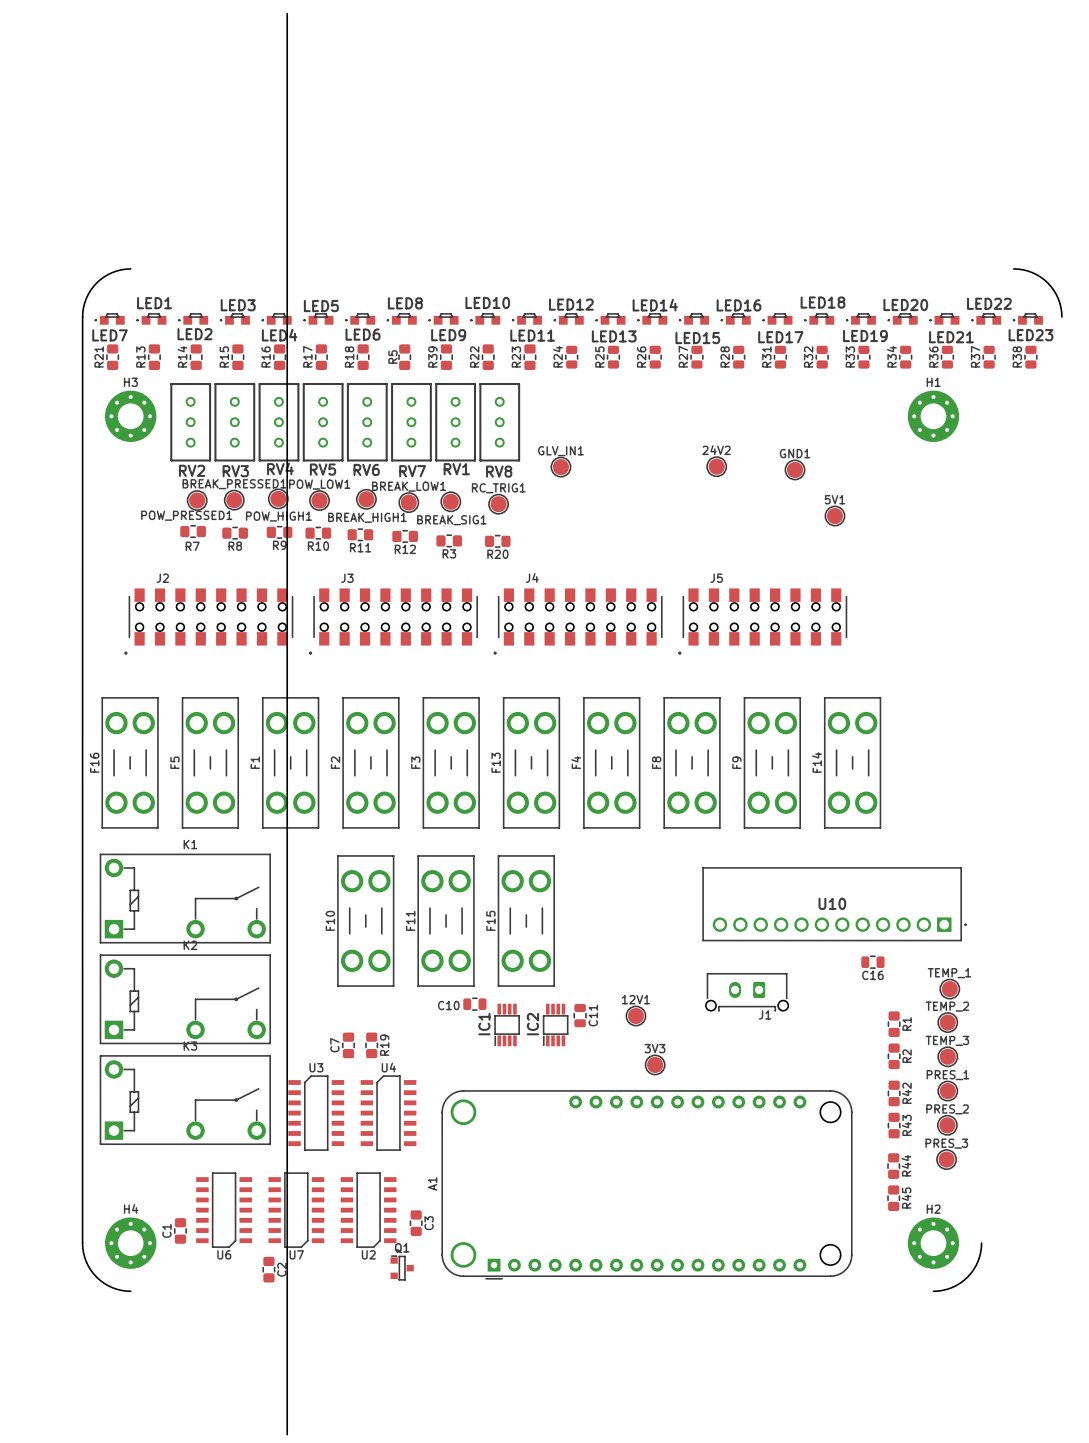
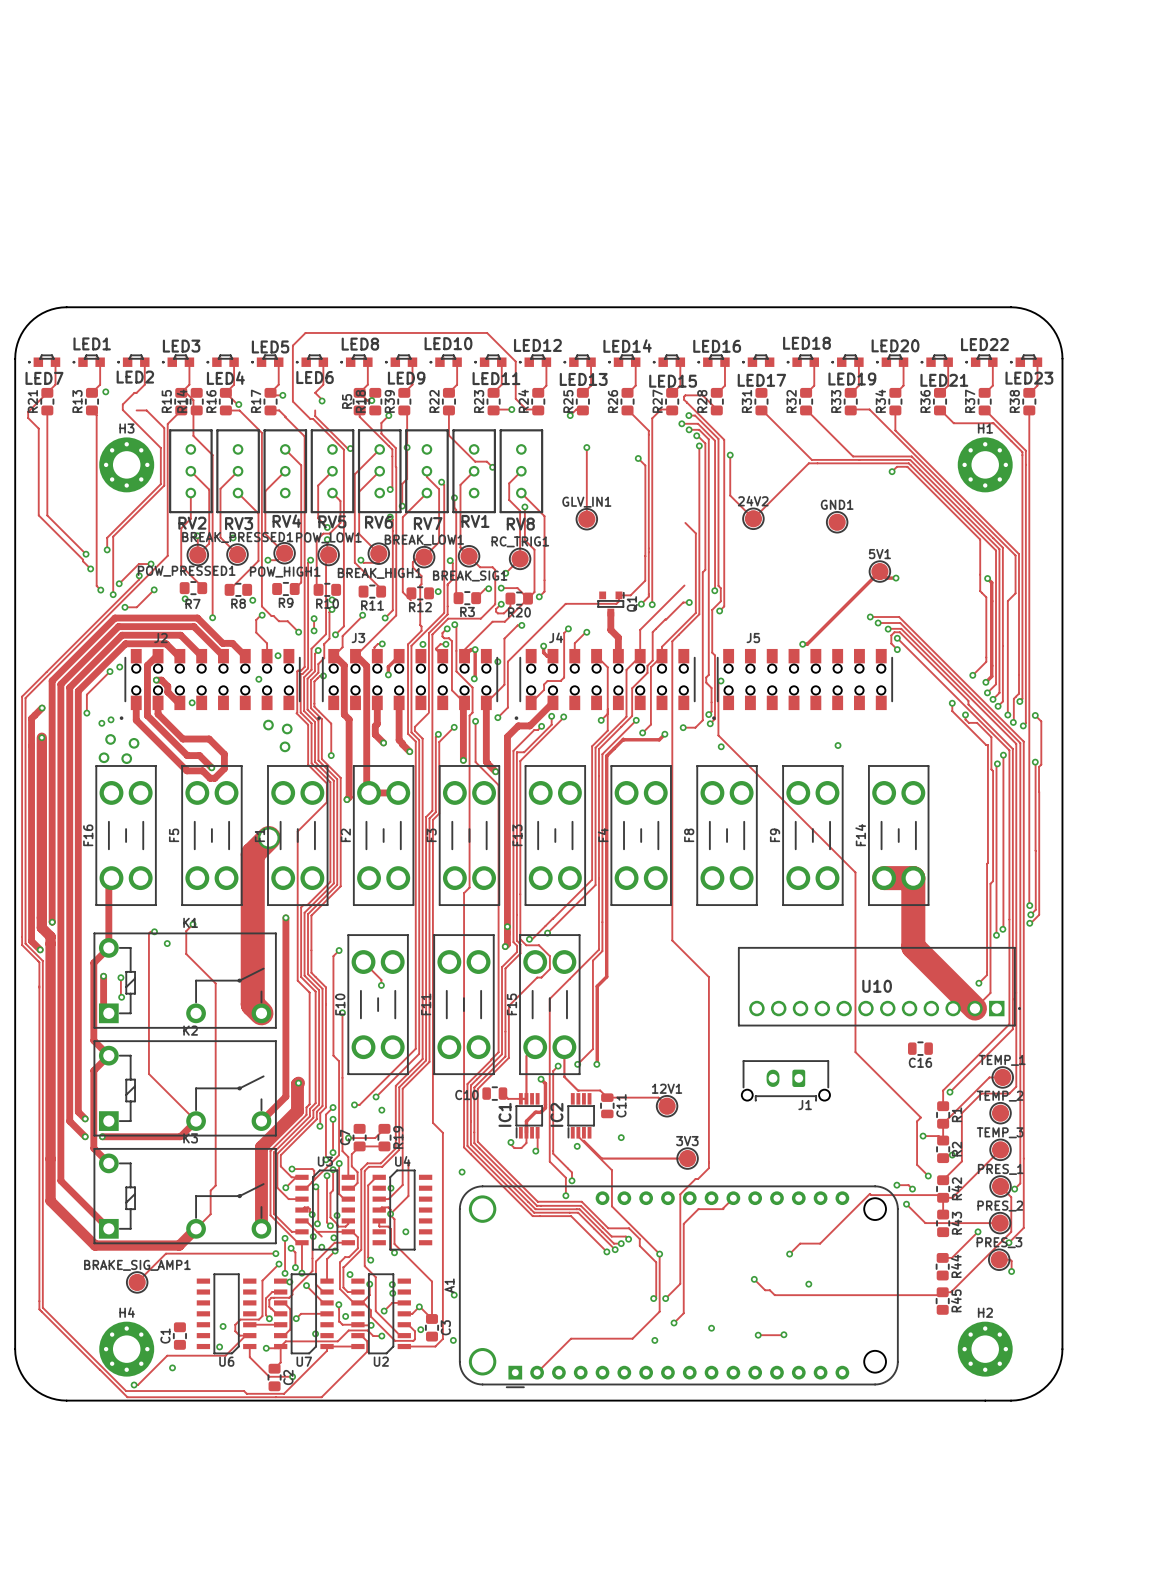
board edge: (287, 13) (287, 1434) -> none
board edge: none -> (66, 307) (1010, 307) (1035, 313) (1050, 326) (1058, 338) (1062, 358) (1062, 1349) (1056, 1373) (1043, 1388) (1025, 1398) (1011, 1400) (66, 1400) (46, 1396) (26, 1381) (19, 1368) (15, 1349) (15, 358) (19, 339) (30, 322) (46, 311) (66, 307)
board edge: (130, 268) (116, 270) (100, 279) (88, 294) (82, 312) (82, 1243) (86, 1261) (96, 1277) (112, 1287) (130, 1291) -> none
board edge: (1013, 268) (1032, 272) (1047, 282) (1058, 298) (1061, 316) -> none
LED7 position: (109, 319) -> (44, 360)
LED1 position: (151, 319) -> (88, 360)
LED2 position: (193, 319) -> (133, 360)
LED3 position: (235, 319) -> (178, 360)
LED4 position: (276, 319) -> (222, 360)
LED5 position: (318, 319) -> (267, 360)
LED6 position: (360, 319) -> (312, 360)
LED8 position: (401, 319) -> (356, 360)
LED9 position: (443, 319) -> (401, 360)
LED10 position: (485, 319) -> (445, 360)
LED11 position: (527, 319) -> (490, 360)
LED12 position: (568, 319) -> (535, 360)
LED13 position: (610, 319) -> (579, 360)
LED14 position: (652, 319) -> (624, 360)
LED15 position: (694, 319) -> (669, 360)
LED16 position: (735, 319) -> (713, 360)
LED17 position: (777, 319) -> (758, 360)
LED18 position: (819, 319) -> (803, 360)
LED19 position: (861, 319) -> (847, 360)
LED20 position: (902, 319) -> (892, 360)
LED21 position: (944, 319) -> (937, 360)
LED22 position: (986, 319) -> (981, 360)
LED23 position: (1028, 319) -> (1026, 360)
track: none -> (55, 362) (55, 384) (28, 412) (28, 418) (38, 428) (38, 515) (90, 568)
track: none -> (100, 362) (100, 384) (91, 392)
track: none -> (144, 362) (144, 384) (122, 404) (122, 409) (160, 448) (160, 484) (107, 537) (107, 549)
track: none -> (189, 362) (189, 384) (181, 392) (186, 392) (193, 400) (193, 435) (212, 455) (212, 617)
track: none -> (234, 362) (234, 384) (225, 392) (238, 404)
track: none -> (278, 362) (278, 384) (270, 392) (273, 395) (282, 395)
track: none -> (323, 362) (323, 384) (315, 392) (322, 401)
track: none -> (367, 362) (367, 384) (359, 392) (367, 400) (371, 400)
track: none -> (412, 362) (412, 384) (404, 392)
track: none -> (457, 362) (457, 384) (448, 392)
track: none -> (501, 362) (501, 384) (493, 392)
track: none -> (546, 362) (546, 385) (538, 393)
track: none -> (591, 362) (591, 385) (582, 393)
track: none -> (635, 362) (635, 385) (627, 393)
track: none -> (680, 362) (680, 385) (672, 393)
track: none -> (724, 362) (724, 385) (716, 393)
track: none -> (814, 362) (814, 385) (806, 393)
track: none -> (858, 362) (858, 385) (850, 393)
track: none -> (903, 362) (903, 385) (895, 393)
track: none -> (948, 362) (948, 385) (940, 393)
track: none -> (992, 362) (992, 385) (984, 393)
track: none -> (1037, 362) (1037, 385) (1029, 393)
R24 footprint: [565, 345, 579, 369] -> [531, 387, 545, 416]
R25 footprint: [607, 345, 620, 369] -> [576, 387, 590, 416]
R26 footprint: [648, 345, 662, 369] -> [620, 387, 635, 416]
R27 footprint: [690, 345, 704, 369] -> [665, 387, 679, 416]
R28 footprint: [732, 345, 746, 369] -> [710, 387, 724, 416]
R31 footprint: [774, 345, 787, 369] -> [754, 387, 769, 416]
R32 footprint: [815, 345, 829, 369] -> [799, 387, 813, 416]
R33 footprint: [857, 345, 871, 369] -> [844, 387, 858, 416]
R34 footprint: [899, 345, 913, 369] -> [888, 387, 902, 416]
R36 footprint: [941, 345, 954, 369] -> [933, 387, 947, 416]
R37 footprint: [982, 345, 996, 369] -> [978, 387, 992, 416]
R38 footprint: [1024, 345, 1038, 369] -> [1022, 387, 1036, 416]
via: none -> (105, 391)
via: none -> (282, 395)
via: none -> (322, 401)
via: none -> (371, 400)
R21 position: (112, 357) -> (47, 401)
R13 position: (154, 357) -> (91, 401)
R15 position: (237, 357) -> (181, 401)
R16 position: (279, 357) -> (225, 401)
R17 position: (321, 357) -> (270, 401)
R5 position: (404, 357) -> (359, 401)
R39 position: (446, 357) -> (404, 401)
R22 position: (488, 357) -> (448, 401)
R23 position: (529, 357) -> (493, 401)
track: none -> (686, 402) (684, 399) (685, 395) (702, 395) (716, 409)
track: none -> (686, 402) (724, 439) (724, 606) (719, 611)
via: none -> (238, 404)
track: none -> (511, 409) (493, 410)
via: none -> (511, 409)
track: none -> (538, 409) (526, 409) (515, 398) (515, 361) (487, 332) (305, 332) (292, 345) (292, 401) (343, 449) (343, 626) (335, 634)
track: none -> (582, 409) (576, 409) (570, 415)
track: none -> (627, 409) (648, 430) (648, 596) (641, 604)
track: none -> (672, 409) (661, 409) (652, 418) (652, 604)
track: none -> (761, 409) (811, 459) (910, 459) (999, 549) (999, 692) (993, 699)
track: none -> (806, 409) (853, 456) (911, 456) (1002, 547) (1002, 701) (998, 706)
track: none -> (850, 409) (869, 409) (1015, 555) (1015, 593) (1007, 601) (1007, 715)
track: none -> (895, 409) (895, 430) (1018, 554) (1018, 693) (1013, 698) (1013, 722)
track: none -> (940, 409) (953, 423) (993, 423) (1022, 452) (1022, 698) (1019, 701)
track: none -> (984, 409) (1025, 450) (1025, 723) (1023, 725)
track: none -> (1029, 409) (1029, 905)
track: none -> (47, 410) (47, 515) (86, 554)
track: none -> (91, 410) (96, 415) (96, 585) (100, 590)
track: none -> (136, 410) (146, 410) (164, 428) (164, 485) (113, 536) (113, 594)
track: none -> (181, 410) (167, 423) (167, 555) (25, 698) (25, 943) (42, 960) (42, 1307) (126, 1391) (244, 1391) (246, 1393) (284, 1393) (327, 1350) (327, 1346) (357, 1346)
track: none -> (225, 410) (239, 410) (261, 432) (261, 606) (278, 621) (287, 621) (298, 632)
track: none -> (270, 410) (279, 410) (304, 436) (304, 667) (297, 671) (296, 713) (308, 724) (308, 764) (326, 783) (326, 802) (297, 831) (297, 980) (309, 992) (309, 1104) (306, 1107) (306, 1114) (270, 1150) (270, 1215) (297, 1242) (301, 1242) (301, 1273)
track: none -> (315, 410) (315, 416) (347, 448) (350, 448)
track: none -> (359, 410) (359, 416) (392, 449) (392, 487) (390, 489)
track: none -> (404, 410) (407, 413) (407, 479) (402, 483) (402, 506)
track: none -> (448, 410) (448, 435) (475, 461) (486, 461) (492, 467)
track: none -> (388, 415) (381, 422) (381, 433) (395, 448) (396, 615) (355, 656) (366, 666) (366, 790) (369, 792) (398, 792)
via: none -> (388, 415)
via: none -> (570, 415)
track: none -> (688, 415) (695, 415) (718, 438) (718, 585) (720, 588) (720, 601) (712, 609) (712, 652) (714, 655) (714, 719) (710, 723)
via: none -> (688, 415)
track: none -> (681, 423) (698, 423) (715, 440) (714, 590)
via: none -> (681, 423)
track: none -> (689, 429) (699, 429) (708, 439) (708, 674) (706, 677) (706, 682) (711, 687) (711, 711) (708, 714)
via: none -> (689, 429)
track: none -> (696, 435) (705, 443) (702, 720) (695, 727) (683, 727)
via: none -> (696, 435)
track: none -> (699, 445) (699, 614) (672, 641) (672, 940) (708, 977) (708, 1168) (680, 1194) (680, 1283) (665, 1298)
via: none -> (699, 445)
via: none -> (407, 447)
track: none -> (586, 447) (586, 519)
via: none -> (586, 447)
track: none -> (285, 449) (301, 465) (301, 582) (294, 588)
via: none -> (350, 448)
track: none -> (379, 449) (354, 474) (354, 562) (381, 588) (381, 591)
track: none -> (730, 455) (730, 495) (753, 518) (808, 463) (908, 463) (996, 550) (996, 684) (987, 692)
via: none -> (730, 455)
track: none -> (638, 458) (645, 465) (645, 556)
via: none -> (638, 458)
via: none -> (492, 467)
track: none -> (190, 471) (209, 489) (209, 543) (197, 554) (197, 535)
track: none -> (238, 471) (220, 488) (220, 537) (237, 554)
track: none -> (285, 471) (265, 491) (265, 533) (284, 553) (277, 560) (267, 560)
track: none -> (332, 471) (318, 485) (318, 518) (327, 527)
track: none -> (379, 471) (359, 491) (359, 534) (378, 553) (378, 561) (363, 562) (360, 560)
track: none -> (426, 471) (426, 477) (439, 489) (439, 542) (424, 557) (418, 557) (412, 562) (412, 567) (421, 575) (421, 630) (408, 644) (408, 733) (415, 741) (415, 1048) (359, 1104) (354, 1104)
track: none -> (474, 471) (460, 484) (460, 547) (480, 567) (492, 567) (495, 569) (495, 604) (480, 618) (448, 618) (432, 634) (432, 810) (426, 817) (426, 1060) (399, 1087) (399, 1149) (382, 1166) (368, 1166) (364, 1170) (364, 1266) (375, 1277) (375, 1311) (400, 1335) (404, 1335)
track: none -> (521, 471) (509, 483) (509, 500) (520, 510) (520, 558) (505, 573)
track: none -> (892, 471) (897, 466) (907, 466) (980, 539) (980, 591) (986, 597) (986, 661) (972, 675)
via: none -> (892, 471)
track: none -> (441, 482) (444, 484) (444, 613) (411, 645) (411, 732) (419, 740) (419, 1053) (376, 1096)
via: none -> (441, 482)
via: none -> (390, 489)
track: none -> (190, 493) (190, 518) (181, 528) (181, 565) (202, 588)
track: none -> (238, 493) (258, 513) (258, 560) (229, 589)
track: none -> (332, 493) (340, 501) (340, 522) (329, 533) (323, 533) (316, 540) (316, 588) (318, 589)
track: none -> (426, 493) (402, 517) (402, 592) (410, 600)
track: none -> (521, 493) (544, 516) (544, 591) (539, 596)
track: none -> (454, 497) (456, 509) (456, 595) (458, 598)
via: none -> (454, 497)
via: none -> (402, 506)
track: none -> (524, 507) (524, 540) (534, 549) (534, 592) (504, 621) (492, 621) (464, 649)
via: none -> (524, 507)
track: none -> (390, 517) (392, 519) (392, 610) (385, 618)
via: none -> (390, 517)
track: none -> (685, 522) (695, 533) (695, 612) (661, 646) (661, 656) (650, 667) (650, 724) (642, 732)
via: none -> (327, 527)
via: none -> (197, 535)
via: none -> (233, 537)
track: none -> (327, 539) (328, 554) (326, 557) (326, 634) (311, 648) (311, 669) (304, 677) (304, 711) (315, 721) (315, 761) (333, 780) (333, 883) (304, 912) (304, 975) (319, 990) (319, 1104) (313, 1110) (313, 1117) (277, 1153) (277, 1187) (288, 1199) (301, 1199)
via: none -> (327, 539)
via: none -> (107, 549)
via: none -> (86, 554)
track: none -> (645, 556) (645, 580) (630, 595) (618, 595) (618, 601) (616, 603) (565, 603) (507, 661) (507, 707) (497, 717)
via: none -> (267, 560)
track: none -> (310, 560) (308, 562) (308, 668) (300, 674) (300, 712) (311, 723) (311, 763) (330, 782) (330, 882) (307, 905) (301, 907) (301, 977) (315, 991) (315, 1103) (309, 1108) (309, 1116) (273, 1152) (273, 1213) (291, 1231) (301, 1231)
via: none -> (310, 560)
via: none -> (360, 560)
track: none -> (450, 560) (452, 563) (452, 579) (447, 584) (447, 614) (428, 633) (428, 712)
via: none -> (450, 560)
track: none -> (151, 564) (138, 564) (119, 583)
via: none -> (151, 564)
via: none -> (90, 568)
via: none -> (505, 573)
track: none -> (139, 575) (139, 579) (22, 696) (22, 945) (39, 962) (39, 1309) (127, 1397) (321, 1397) (367, 1351) (367, 1341) (361, 1335) (357, 1335)
via: none -> (139, 575)
track: none -> (896, 578) (886, 578) (879, 571) (807, 644) (802, 644)
via: none -> (896, 578)
track: none -> (987, 578) (991, 582) (991, 676) (985, 682)
via: none -> (987, 578)
via: none -> (119, 583)
track: none -> (684, 585) (640, 629) (640, 656) (626, 669) (626, 716) (595, 747) (595, 885) (547, 933)
track: none -> (501, 588) (517, 588) (528, 598)
via: none -> (501, 588)
track: none -> (488, 588) (485, 588) (476, 598)
via: none -> (488, 588)
via: none -> (100, 590)
track: none -> (154, 589) (136, 607) (124, 607)
via: none -> (154, 589)
via: none -> (714, 590)
via: none -> (438, 591)
via: none -> (113, 594)
via: none -> (539, 596)
via: none -> (185, 598)
track: none -> (510, 598) (510, 606) (503, 613) (497, 613) (496, 609) (501, 604)
via: none -> (252, 600)
via: none -> (332, 599)
track: none -> (689, 602) (683, 602) (652, 632) (652, 660) (647, 665) (647, 672) (632, 688) (632, 715) (598, 749) (598, 949) (549, 998) (549, 1161) (565, 1177) (565, 1195)
via: none -> (689, 602)
via: none -> (501, 604)
via: none -> (641, 604)
via: none -> (652, 604)
via: none -> (124, 607)
track: none -> (332, 609) (329, 612) (329, 638) (323, 644) (324, 658) (318, 664) (318, 672) (310, 680) (310, 708) (321, 719) (321, 759) (340, 777) (340, 886) (311, 915) (311, 972) (325, 987) (325, 1107) (320, 1113) (319, 1126)
via: none -> (332, 609)
via: none -> (719, 611)
track: none -> (610, 612) (610, 629) (618, 637) (618, 656)
track: none -> (262, 615) (256, 619) (256, 632) (267, 643) (268, 656)
via: none -> (262, 615)
track: none -> (362, 615) (342, 636) (342, 647) (333, 656) (344, 665) (344, 714) (349, 719) (349, 797) (346, 799)
via: none -> (362, 615)
track: none -> (870, 617) (899, 617) (1023, 741) (1023, 1227) (1008, 1242)
via: none -> (870, 617)
via: none -> (212, 617)
via: none -> (385, 618)
track: none -> (314, 618) (314, 630)
via: none -> (314, 618)
track: none -> (878, 623) (900, 623) (1020, 743) (1020, 1183) (1014, 1189)
via: none -> (878, 623)
track: none -> (454, 624) (456, 626) (456, 671) (472, 687) (472, 712) (469, 715) (469, 887) (464, 893) (464, 1147) (532, 1216) (571, 1216) (606, 1251)
via: none -> (454, 624)
track: none -> (521, 625) (517, 625) (504, 638) (504, 684) (486, 702) (486, 761) (495, 771)
via: none -> (521, 625)
track: none -> (447, 628) (442, 633) (442, 636) (451, 641) (451, 690) (464, 702) (463, 760)
via: none -> (447, 628)
track: none -> (568, 628) (564, 633) (564, 677) (561, 681) (547, 681) (544, 684) (544, 689) (531, 702)
via: none -> (568, 628)
track: none -> (888, 629) (901, 628) (1016, 743) (1016, 1086) (1009, 1093) (981, 1093) (961, 1113) (961, 1161) (943, 1180)
via: none -> (888, 629)
via: none -> (314, 630)
via: none -> (298, 632)
track: none -> (586, 632) (574, 643) (574, 656)
via: none -> (586, 632)
via: none -> (335, 634)
track: none -> (897, 638) (1009, 750) (1009, 1024) (943, 1090) (943, 1106)
via: none -> (897, 638)
track: none -> (382, 643) (377, 643) (374, 647) (374, 653) (377, 656)
via: none -> (382, 643)
via: none -> (422, 644)
track: none -> (445, 644) (440, 644) (436, 648) (442, 656)
via: none -> (445, 644)
via: none -> (802, 644)
track: none -> (543, 646) (543, 652) (547, 656) (552, 656)
via: none -> (543, 646)
track: none -> (318, 650) (314, 653) (314, 671) (307, 678) (307, 709) (318, 720) (318, 760) (337, 779) (337, 884) (307, 914) (307, 974) (322, 988) (322, 1106) (316, 1111) (316, 1119) (280, 1155) (280, 1166) (291, 1177) (301, 1177)
via: none -> (318, 650)
via: none -> (475, 649)
track: none -> (897, 649) (891, 643) (891, 635) (894, 632) (899, 632) (968, 700) (968, 704) (1012, 748) (1012, 1029) (949, 1092)
via: none -> (897, 649)
via: none -> (278, 655)
track: none -> (156, 656) (147, 665) (147, 715) (187, 755) (199, 755) (211, 767)
track: none -> (179, 656) (166, 643) (125, 643) (78, 691) (78, 1111) (85, 1118)
track: none -> (201, 656) (180, 635) (122, 635) (69, 687) (69, 1121) (85, 1136)
track: none -> (223, 656) (193, 626) (118, 626) (60, 684) (60, 1180) (108, 1228)
track: none -> (245, 656) (232, 643) (222, 643) (197, 618) (114, 618) (52, 680) (52, 922)
track: none -> (399, 656) (388, 666) (388, 674)
track: none -> (464, 656) (471, 649) (475, 649) (474, 678)
track: none -> (596, 656) (607, 667) (607, 730) (592, 746) (592, 879) (532, 939) (529, 939)
via: none -> (497, 661)
via: none -> (119, 667)
track: none -> (110, 671) (86, 694) (86, 713)
via: none -> (110, 671)
via: none -> (388, 674)
track: none -> (323, 675) (320, 675) (314, 681) (314, 706) (331, 723) (331, 755)
via: none -> (323, 675)
via: none -> (972, 675)
via: none -> (258, 679)
via: none -> (474, 678)
track: none -> (156, 680) (161, 680) (167, 686) (167, 692) (179, 702)
via: none -> (156, 680)
track: none -> (720, 681) (718, 683) (718, 735) (855, 872) (855, 1052) (920, 1117) (917, 1121) (917, 1164) (928, 1176)
via: none -> (720, 681)
via: none -> (985, 682)
via: none -> (987, 692)
via: none -> (993, 699)
via: none -> (1019, 701)
track: none -> (136, 702) (136, 720) (186, 770) (202, 770) (210, 778) (214, 778) (224, 768) (224, 754) (209, 739) (182, 739) (158, 714) (158, 702)
via: none -> (192, 702)
track: none -> (377, 702) (375, 734) (383, 742)
track: none -> (399, 702) (399, 740) (409, 751)
track: none -> (552, 702) (529, 725) (518, 725) (507, 736) (507, 944) (505, 946)
track: none -> (952, 703) (952, 711) (987, 745) (987, 862)
via: none -> (952, 703)
via: none -> (998, 706)
track: none -> (42, 708) (31, 718) (31, 941) (40, 949)
via: none -> (42, 708)
via: none -> (86, 713)
track: none -> (428, 713) (414, 726) (414, 730) (422, 738) (422, 1059) (395, 1085) (395, 1148) (380, 1163) (367, 1163) (361, 1169) (361, 1249) (343, 1267) (343, 1287) (347, 1292) (357, 1292)
track: none -> (607, 713) (601, 720)
via: none -> (708, 714)
track: none -> (965, 714) (965, 719) (968, 722) (977, 722) (991, 737) (991, 769) (993, 771) (990, 993) (974, 1008) (913, 946) (913, 878) (884, 878)
via: none -> (965, 714)
via: none -> (1007, 715)
track: none -> (1035, 715) (1041, 721) (1041, 764) (1039, 766) (1039, 914) (1029, 923)
via: none -> (1035, 715)
track: none -> (551, 716) (551, 724) (524, 752) (516, 752) (516, 940) (520, 944) (520, 953) (505, 968) (505, 1056) (474, 1087) (474, 1143) (537, 1205) (581, 1205) (611, 1236) (625, 1236) (628, 1239)
via: none -> (551, 716)
track: none -> (563, 716) (520, 760) (520, 939) (526, 945) (539, 945) (549, 956) (549, 969) (541, 977) (537, 977) (508, 1005) (508, 1057) (477, 1088) (477, 1141) (537, 1201) (581, 1201) (608, 1228) (629, 1228) (639, 1239) (639, 1245) (656, 1262) (656, 1298)
via: none -> (563, 716)
via: none -> (497, 717)
via: none -> (111, 719)
via: none -> (601, 720)
track: none -> (636, 720) (602, 754) (602, 951) (592, 960) (592, 1049) (577, 1064)
via: none -> (636, 720)
track: none -> (475, 721) (475, 762) (498, 785) (498, 1052) (467, 1083) (467, 1146) (534, 1212) (578, 1212) (615, 1249)
via: none -> (475, 721)
via: none -> (101, 723)
via: none -> (1013, 722)
via: none -> (710, 723)
via: none -> (268, 725)
track: none -> (541, 726) (537, 730) (534, 730) (513, 750) (513, 942) (517, 945) (517, 952) (502, 967) (502, 1054) (470, 1085) (470, 1144) (535, 1209) (579, 1209) (613, 1243) (621, 1243)
via: none -> (541, 726)
via: none -> (1023, 725)
track: none -> (454, 727) (439, 741) (439, 813) (432, 819) (432, 1122) (442, 1132) (442, 1339) (435, 1346) (404, 1346)
via: none -> (454, 727)
via: none -> (683, 727)
via: none -> (287, 728)
via: none -> (642, 732)
track: none -> (438, 734) (435, 736) (435, 812) (429, 818) (429, 1061) (402, 1088) (402, 1185) (388, 1199) (379, 1199)
via: none -> (438, 734)
track: none -> (664, 734) (659, 739) (623, 739) (606, 756) (606, 976) (597, 986) (596, 1064)
via: none -> (664, 734)
track: none -> (41, 737) (41, 927) (50, 936) (50, 1201) (95, 1245) (179, 1245) (210, 1214) (210, 1190) (215, 1185) (215, 983) (186, 954) (186, 931) (193, 924)
via: none -> (41, 737)
via: none -> (110, 739)
via: none -> (134, 743)
via: none -> (383, 742)
via: none -> (838, 745)
via: none -> (285, 746)
via: none -> (721, 746)
via: none -> (409, 751)
track: none -> (1003, 755) (1002, 929)
via: none -> (1003, 755)
via: none -> (331, 755)
via: none -> (104, 757)
via: none -> (126, 758)
via: none -> (463, 760)
track: none -> (1035, 762) (1035, 909) (1030, 914)
via: none -> (1035, 762)
track: none -> (997, 763) (996, 935)
via: none -> (997, 763)
via: none -> (211, 767)
via: none -> (495, 771)
via: none -> (346, 799)
track: none -> (268, 838) (252, 854) (252, 1004) (261, 1013)
via: none -> (268, 838)
track: none -> (988, 862) (987, 975) (978, 983)
track: none -> (111, 878) (108, 880) (108, 947) (93, 962) (93, 1040) (108, 1055) (93, 1070) (93, 1148) (108, 1163)
via: none -> (1029, 905)
via: none -> (1030, 914)
track: none -> (285, 917) (285, 1096) (261, 1121)
via: none -> (285, 917)
via: none -> (52, 922)
via: none -> (1029, 923)
via: none -> (193, 924)
via: none -> (507, 926)
via: none -> (1002, 929)
track: none -> (154, 931) (148, 933) (148, 1073) (196, 1121) (180, 1136) (102, 1136)
via: none -> (154, 931)
via: none -> (547, 933)
via: none -> (996, 935)
via: none -> (529, 939)
via: none -> (167, 943)
via: none -> (505, 946)
via: none -> (40, 949)
track: none -> (339, 950) (333, 956) (333, 1055) (339, 1061)
via: none -> (339, 950)
track: none -> (363, 962) (381, 979) (381, 985)
track: none -> (103, 976) (103, 1008) (108, 1013)
via: none -> (103, 976)
track: none -> (120, 977) (121, 997)
via: none -> (120, 977)
via: none -> (978, 983)
via: none -> (381, 985)
via: none -> (121, 997)
track: none -> (342, 1012) (342, 1151) (348, 1156) (348, 1177)
via: none -> (342, 1012)
track: none -> (564, 1047) (564, 1076) (578, 1090) (600, 1090) (607, 1097) (658, 1097) (667, 1106)
track: none -> (526, 1055) (526, 1098) (508, 1098) (502, 1093)
track: none -> (339, 1061) (339, 1155) (306, 1188) (301, 1188)
via: none -> (577, 1064)
via: none -> (596, 1064)
track: none -> (558, 1066) (553, 1071) (553, 1153) (571, 1172) (571, 1180)
via: none -> (558, 1066)
track: none -> (1002, 1077) (989, 1077) (943, 1123) (943, 1140) (938, 1136) (923, 1136)
track: none -> (541, 1079) (545, 1083) (545, 1107) (541, 1112) (535, 1112) (526, 1121) (526, 1143) (521, 1148) (514, 1148) (510, 1142)
via: none -> (541, 1079)
track: none -> (298, 1083) (297, 1111) (261, 1147) (261, 1228)
via: none -> (298, 1083)
via: none -> (949, 1092)
via: none -> (376, 1096)
via: none -> (354, 1104)
track: none -> (333, 1107) (325, 1114) (325, 1159)
via: none -> (333, 1107)
via: none -> (381, 1110)
via: none -> (85, 1118)
track: none -> (333, 1119) (333, 1152)
via: none -> (333, 1119)
via: none -> (319, 1126)
track: none -> (384, 1128) (375, 1138) (348, 1138)
track: none -> (537, 1132) (537, 1149) (535, 1151)
track: none -> (578, 1132) (578, 1136) (611, 1170) (611, 1206) (659, 1254) (659, 1311) (632, 1338) (571, 1338) (537, 1372)
via: none -> (923, 1136)
via: none -> (85, 1136)
via: none -> (102, 1136)
via: none -> (348, 1138)
via: none -> (621, 1137)
track: none -> (583, 1140) (601, 1158) (687, 1158)
via: none -> (510, 1142)
track: none -> (384, 1146) (359, 1146) (351, 1154) (351, 1166) (357, 1172) (357, 1183) (352, 1188)
via: none -> (577, 1146)
track: none -> (1000, 1149) (952, 1197) (943, 1197)
via: none -> (535, 1151)
via: none -> (333, 1152)
via: none -> (952, 1155)
via: none -> (325, 1159)
track: none -> (408, 1161) (408, 1196) (390, 1213)
track: none -> (339, 1163) (339, 1193) (344, 1199) (348, 1199)
via: none -> (339, 1163)
track: none -> (292, 1169) (312, 1169) (314, 1180)
via: none -> (292, 1169)
track: none -> (333, 1169) (330, 1217) (338, 1226) (345, 1226) (348, 1220)
via: none -> (333, 1169)
via: none -> (462, 1172)
track: none -> (327, 1175) (327, 1222) (330, 1225)
via: none -> (327, 1175)
via: none -> (928, 1176)
track: none -> (296, 1177) (285, 1187)
track: none -> (379, 1177) (376, 1177) (368, 1185) (368, 1257) (370, 1260)
via: none -> (571, 1180)
track: none -> (896, 1185) (908, 1185) (912, 1189)
via: none -> (896, 1185)
track: none -> (315, 1186) (318, 1189) (317, 1223)
via: none -> (315, 1186)
track: none -> (1000, 1186) (1011, 1197) (1011, 1231) (950, 1292) (942, 1292) (939, 1295) (774, 1295) (769, 1290) (765, 1290) (754, 1279)
via: none -> (285, 1187)
via: none -> (391, 1188)
via: none -> (912, 1189)
via: none -> (1014, 1189)
via: none -> (565, 1195)
track: none -> (943, 1197) (943, 1214)
track: none -> (943, 1197) (940, 1195) (869, 1193) (820, 1243) (800, 1243) (789, 1254)
track: none -> (733, 1198) (723, 1209) (698, 1209) (683, 1223) (683, 1313) (674, 1322)
track: none -> (906, 1204) (925, 1223) (1000, 1223)
via: none -> (906, 1204)
track: none -> (301, 1210) (308, 1207) (312, 1214)
track: none -> (379, 1210) (381, 1207) (388, 1207) (390, 1209) (390, 1215) (394, 1219) (394, 1244) (432, 1281) (432, 1318) (419, 1306) (412, 1313) (404, 1313)
via: none -> (390, 1213)
via: none -> (312, 1214)
via: none -> (337, 1215)
track: none -> (306, 1220) (321, 1236)
track: none -> (379, 1220) (379, 1226) (388, 1226) (391, 1229) (391, 1249) (394, 1252)
via: none -> (317, 1223)
via: none -> (330, 1225)
track: none -> (316, 1231) (352, 1231) (357, 1237) (357, 1248) (349, 1257) (345, 1257) (339, 1262) (339, 1289) (353, 1302) (363, 1302) (370, 1310) (370, 1316) (395, 1340) (413, 1340) (414, 1331) (408, 1324) (404, 1324)
via: none -> (405, 1231)
track: none -> (978, 1231) (951, 1257) (942, 1257)
via: none -> (978, 1231)
track: none -> (313, 1236) (312, 1271) (292, 1291) (289, 1297) (271, 1297) (269, 1299) (269, 1306) (276, 1313) (280, 1313)
via: none -> (313, 1236)
track: none -> (285, 1238) (285, 1273)
via: none -> (285, 1238)
via: none -> (333, 1237)
via: none -> (628, 1239)
track: none -> (348, 1242) (334, 1242) (315, 1261) (315, 1284) (323, 1292) (327, 1292)
via: none -> (1008, 1242)
via: none -> (621, 1243)
via: none -> (321, 1247)
track: none -> (291, 1248) (295, 1252) (295, 1267)
via: none -> (291, 1248)
via: none -> (615, 1249)
track: none -> (335, 1251) (327, 1259) (327, 1281)
via: none -> (335, 1251)
via: none -> (606, 1251)
track: none -> (275, 1253) (165, 1253) (137, 1282)
via: none -> (275, 1253)
via: none -> (394, 1252)
via: none -> (659, 1254)
via: none -> (789, 1254)
via: none -> (370, 1260)
track: none -> (999, 1259) (1010, 1259) (1011, 1271)
track: none -> (279, 1264) (262, 1280) (262, 1316) (259, 1319) (240, 1319) (235, 1324) (235, 1331) (239, 1335) (249, 1335)
via: none -> (279, 1264)
via: none -> (295, 1267)
via: none -> (1011, 1271)
via: none -> (285, 1273)
via: none -> (301, 1273)
via: none -> (350, 1274)
via: none -> (754, 1279)
BRAKE_SIG_AMP1: none -> (137, 1282)
via: none -> (289, 1281)
track: none -> (369, 1284) (369, 1295) (362, 1302)
via: none -> (369, 1284)
via: none -> (392, 1284)
via: none -> (808, 1284)
track: none -> (306, 1285) (323, 1302) (327, 1302)
via: none -> (306, 1285)
track: none -> (280, 1292) (272, 1292) (265, 1298) (265, 1315) (269, 1318)
via: none -> (392, 1293)
via: none -> (454, 1295)
via: none -> (653, 1298)
via: none -> (665, 1298)
track: none -> (280, 1302) (284, 1302) (290, 1309) (290, 1329) (284, 1335) (280, 1335)
track: none -> (404, 1302) (392, 1302) (384, 1311)
track: none -> (338, 1304) (339, 1321) (342, 1324) (371, 1325)
via: none -> (338, 1304)
via: none -> (419, 1306)
via: none -> (384, 1311)
track: none -> (327, 1313) (301, 1313) (296, 1318)
via: none -> (345, 1316)
via: none -> (269, 1318)
via: none -> (296, 1318)
via: none -> (674, 1322)
track: none -> (249, 1324) (280, 1324)
via: none -> (371, 1325)
via: none -> (223, 1326)
via: none -> (711, 1328)
via: none -> (420, 1329)
via: none -> (315, 1333)
track: none -> (783, 1334) (758, 1335)
via: none -> (783, 1334)
track: none -> (245, 1335) (225, 1355) (167, 1355) (137, 1385) (134, 1385)
track: none -> (381, 1336) (373, 1336) (367, 1330) (348, 1330) (337, 1341) (285, 1341) (278, 1348) (266, 1348)
via: none -> (381, 1336)
via: none -> (758, 1335)
via: none -> (453, 1340)
via: none -> (654, 1340)
track: none -> (249, 1346) (249, 1357) (269, 1376) (292, 1376)
track: none -> (280, 1346) (280, 1362) (274, 1368)
via: none -> (219, 1346)
via: none -> (266, 1348)
board edge: (981, 1243) (977, 1261) (967, 1277) (951, 1287) (933, 1291) -> none
via: none -> (172, 1367)
Q1 rotation: 0° (402, 1267) -> 90° clockwise (611, 603)
Q1 position: (402, 1267) -> (611, 603)
via: none -> (292, 1376)
via: none -> (134, 1385)

